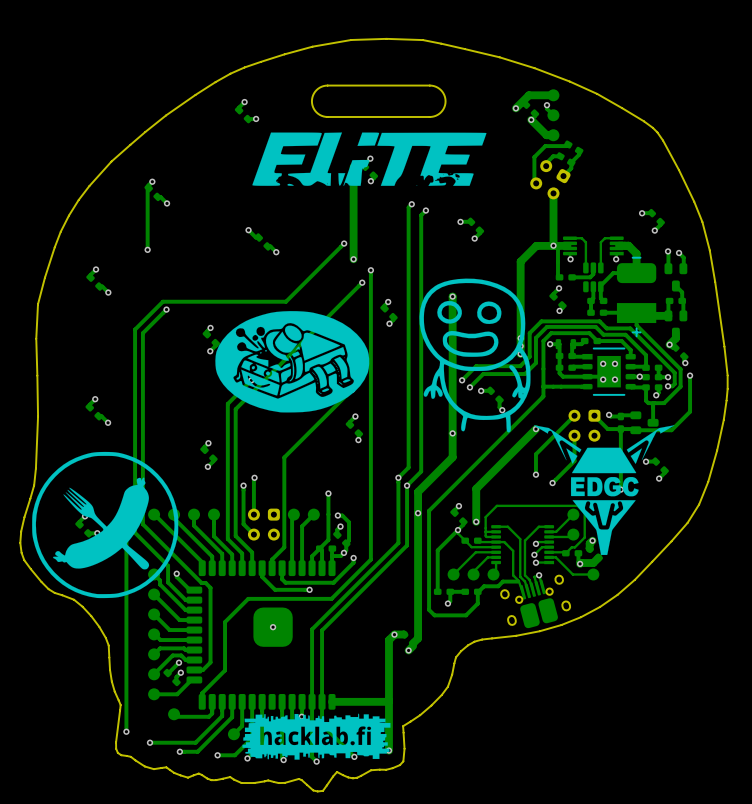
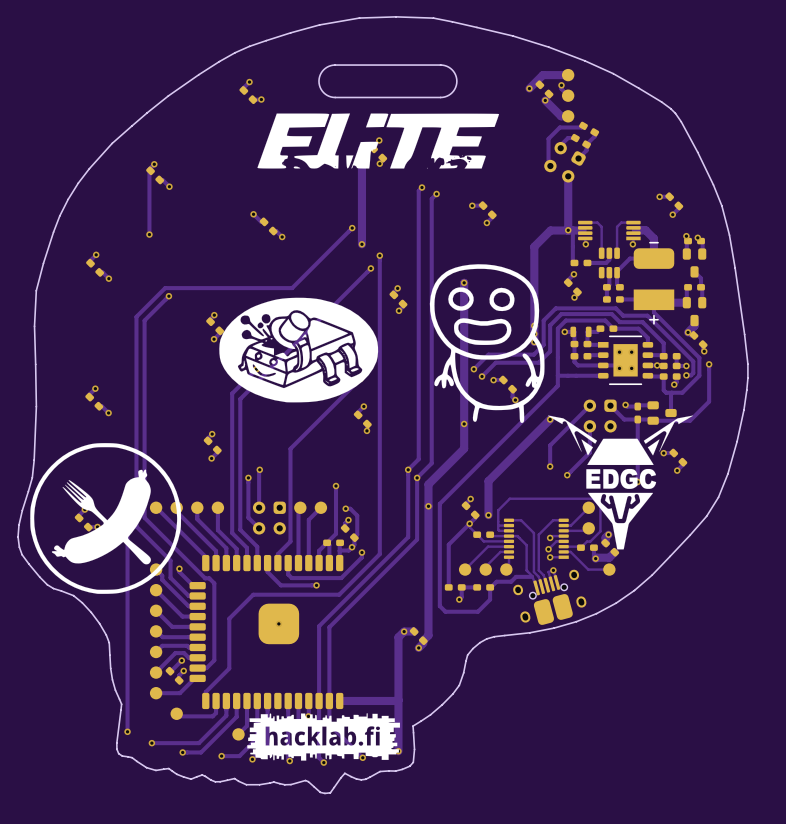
part: none -> (694, 241)

